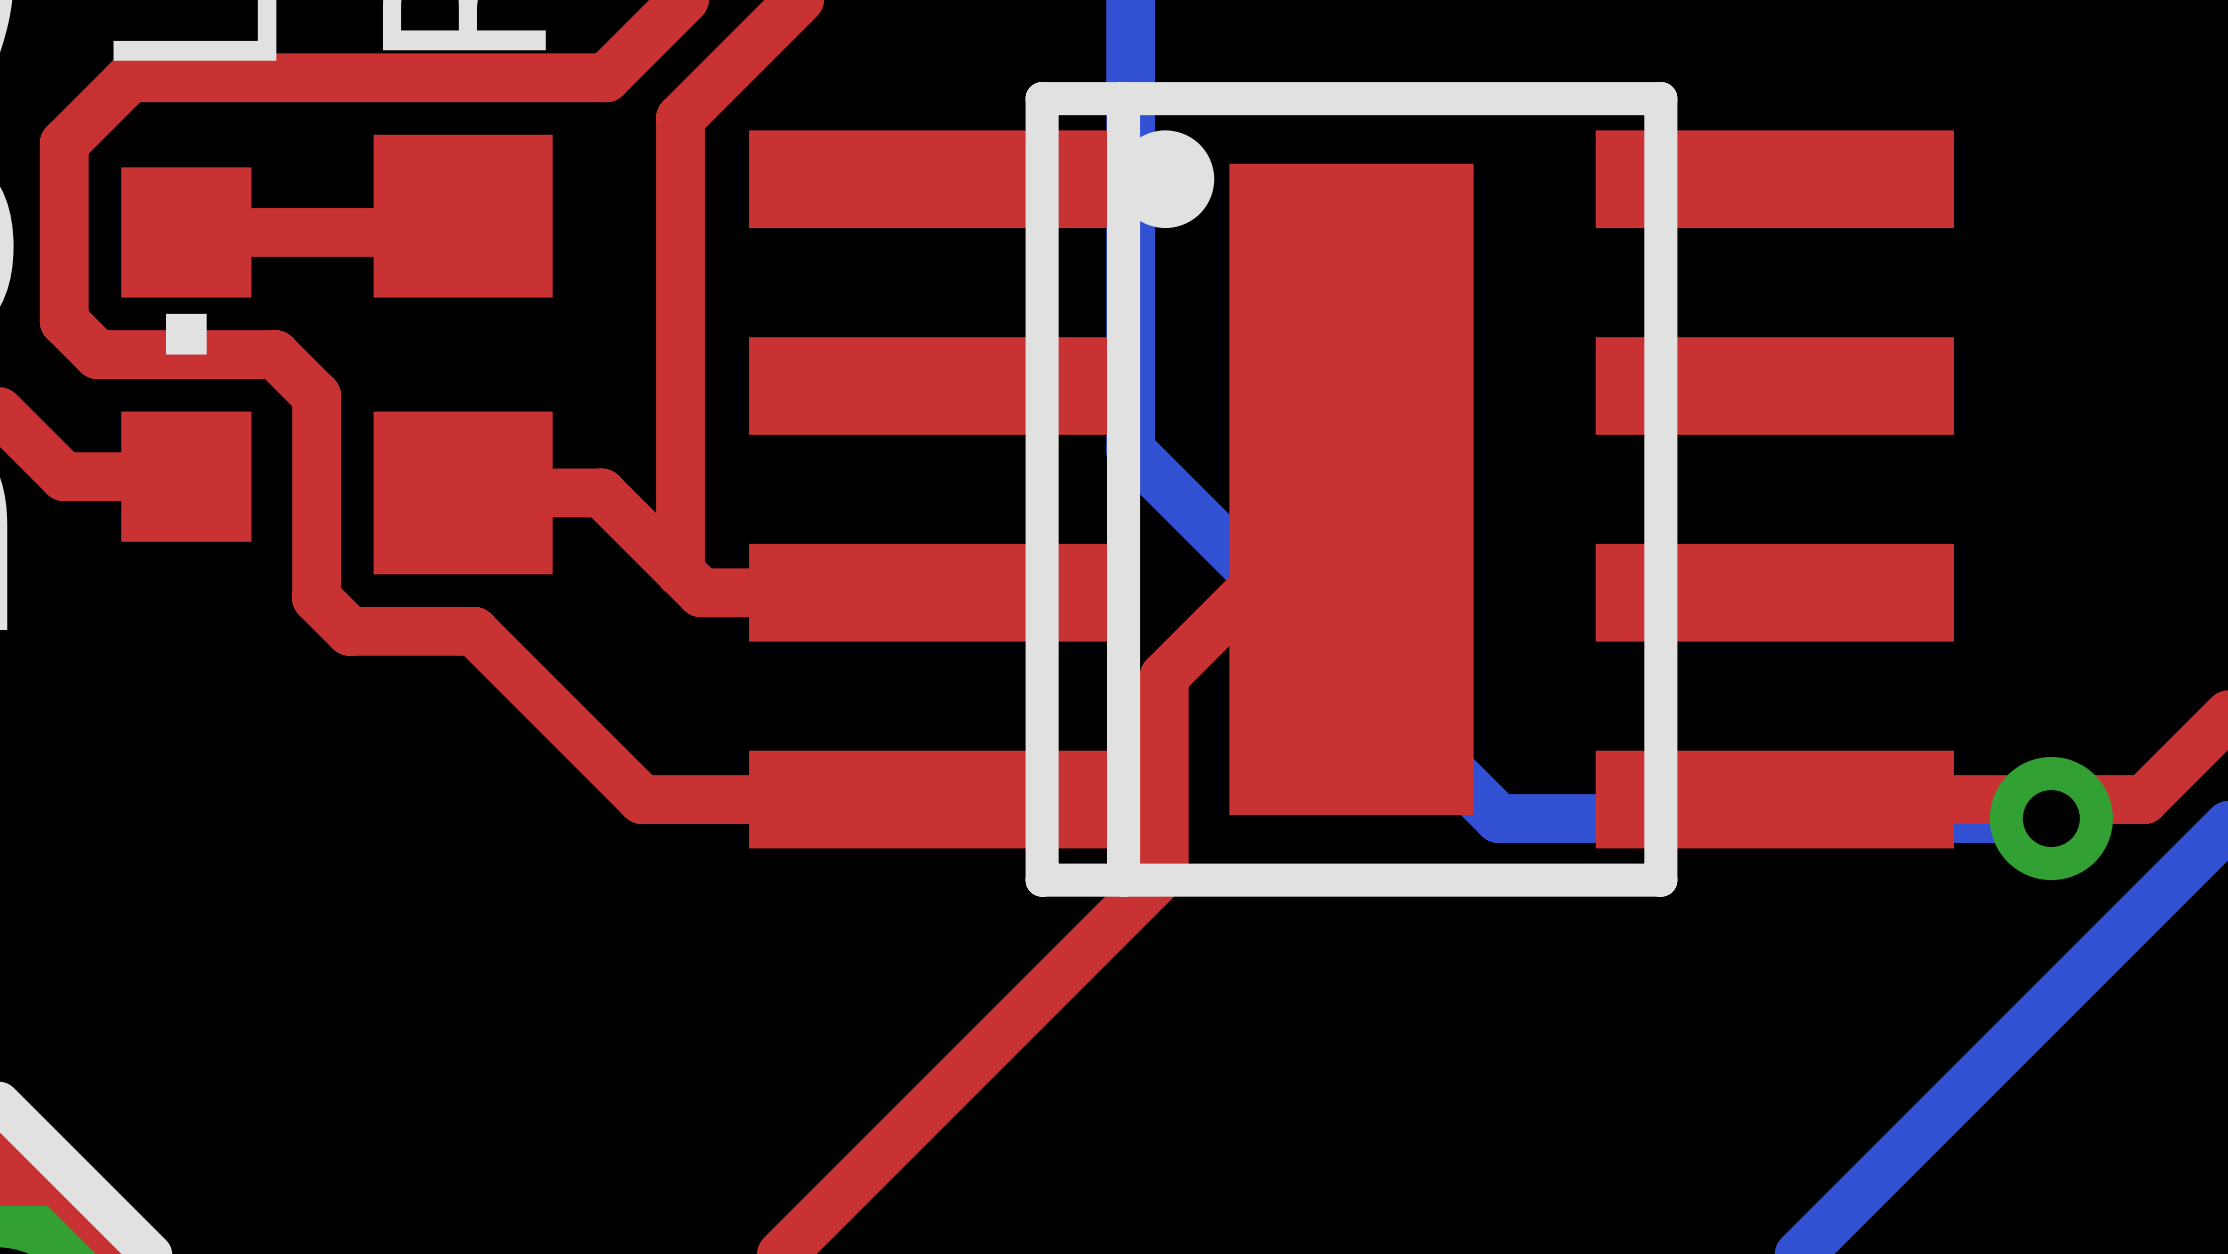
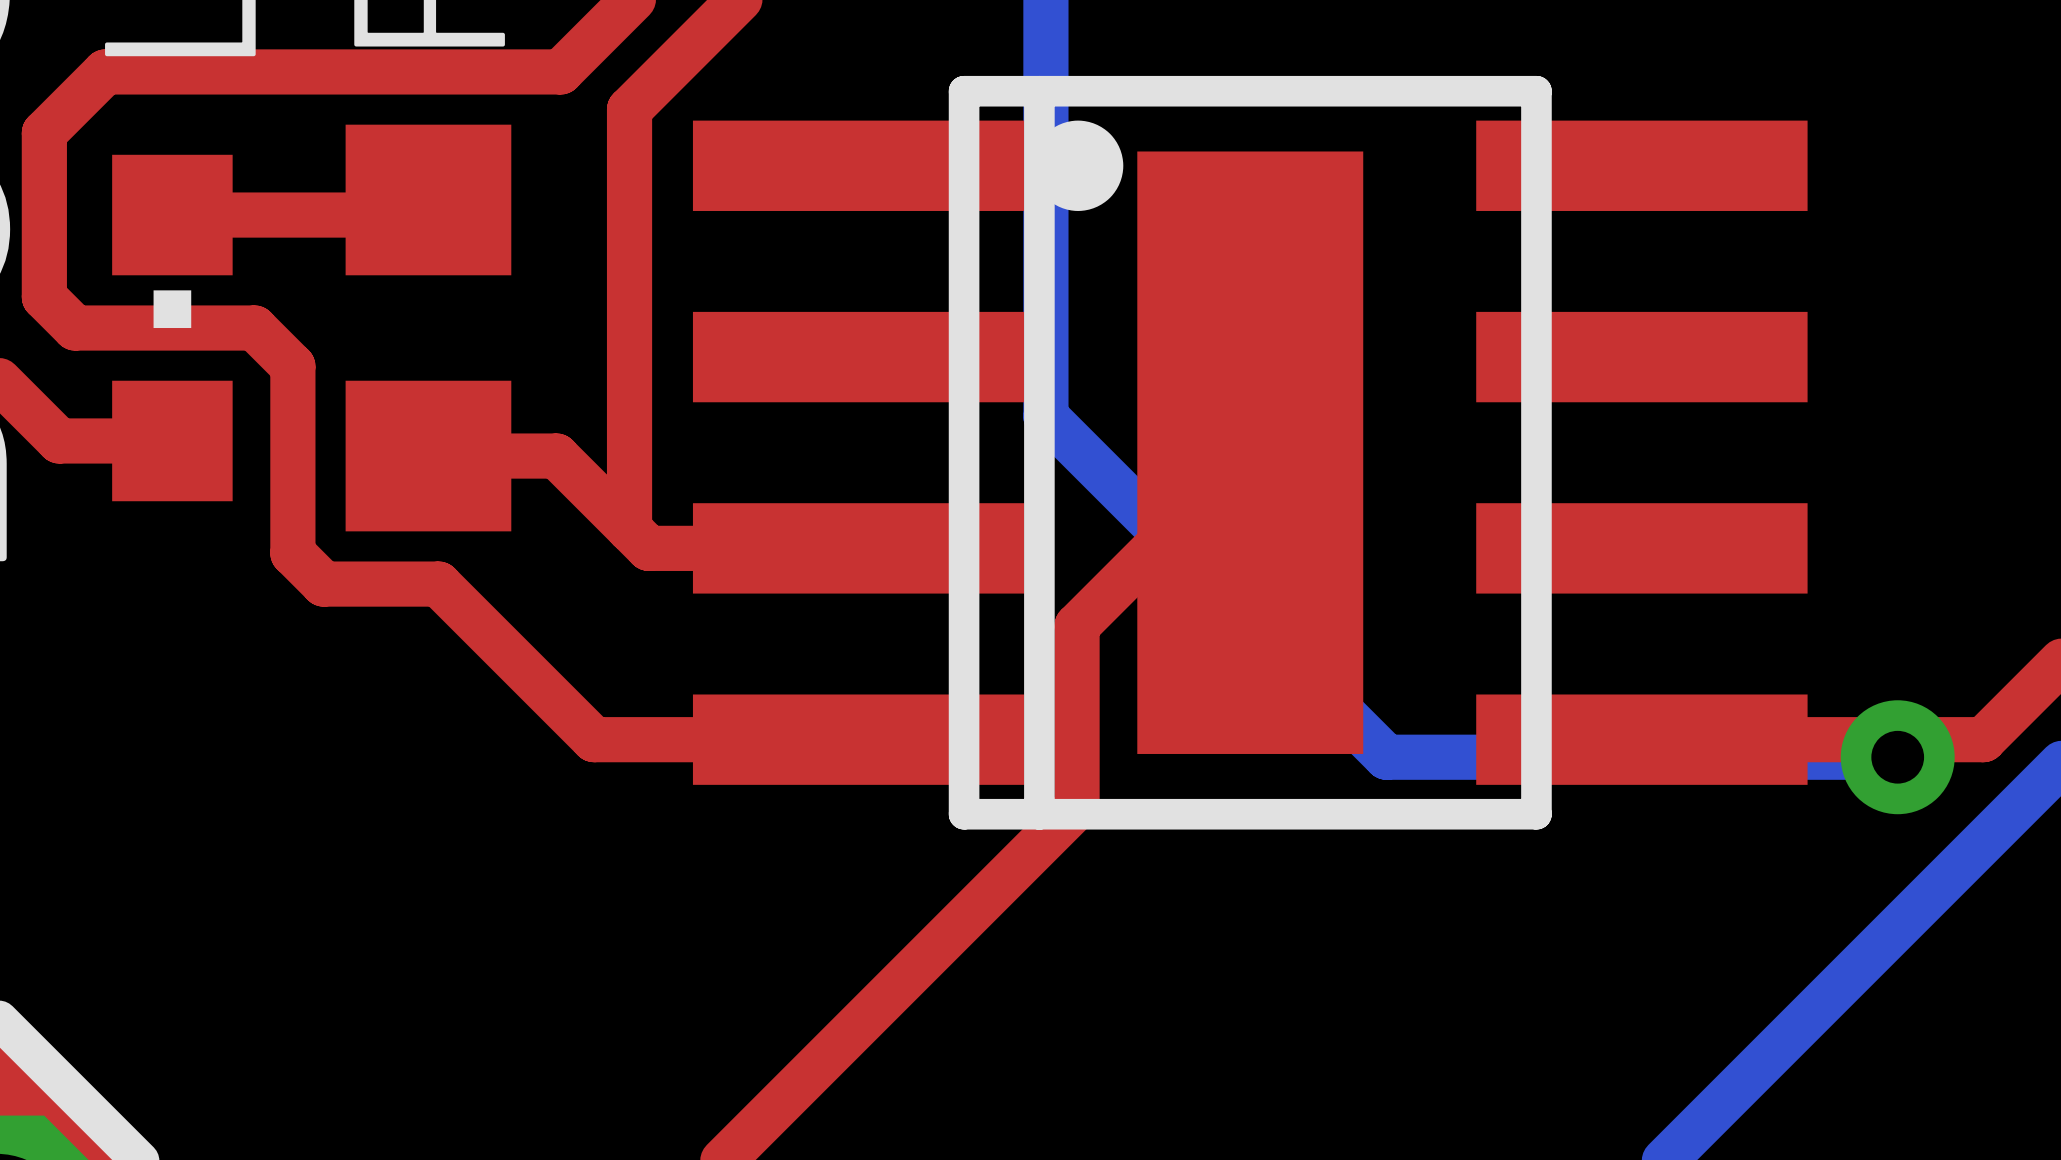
top track: (130, 77) (64, 143) (64, 321) (97, 354) -> (120, 71) (105, 71) (44, 132) (44, 297) (75, 328) (90, 328)

